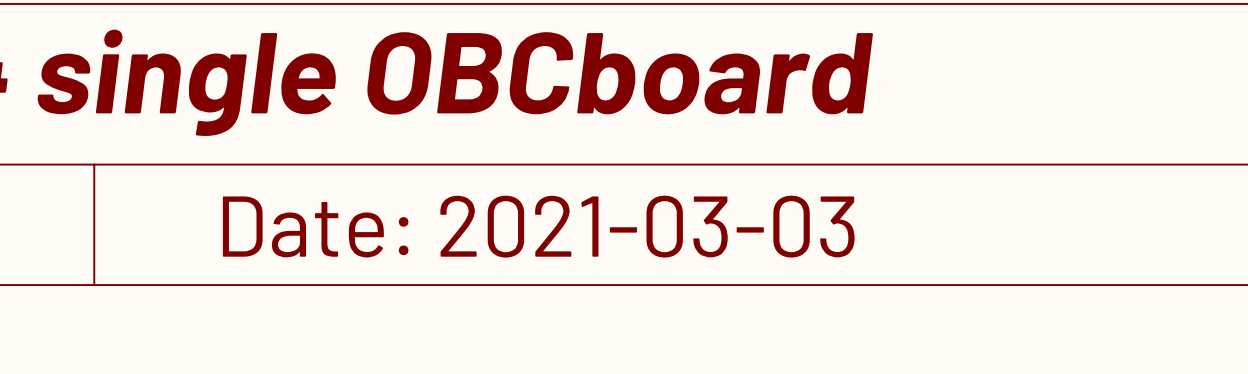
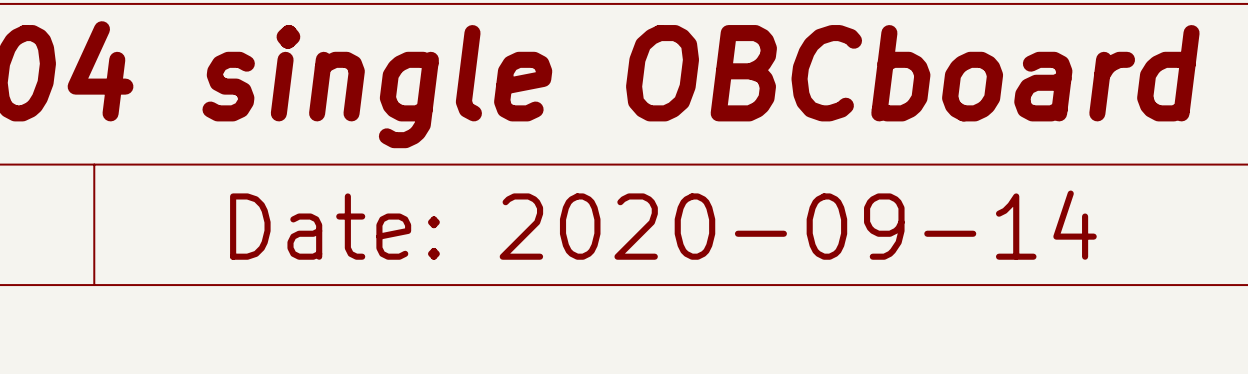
title block: Date: 2021-03-03 (538, 226) -> Date: 2020-09-14 (663, 225)

